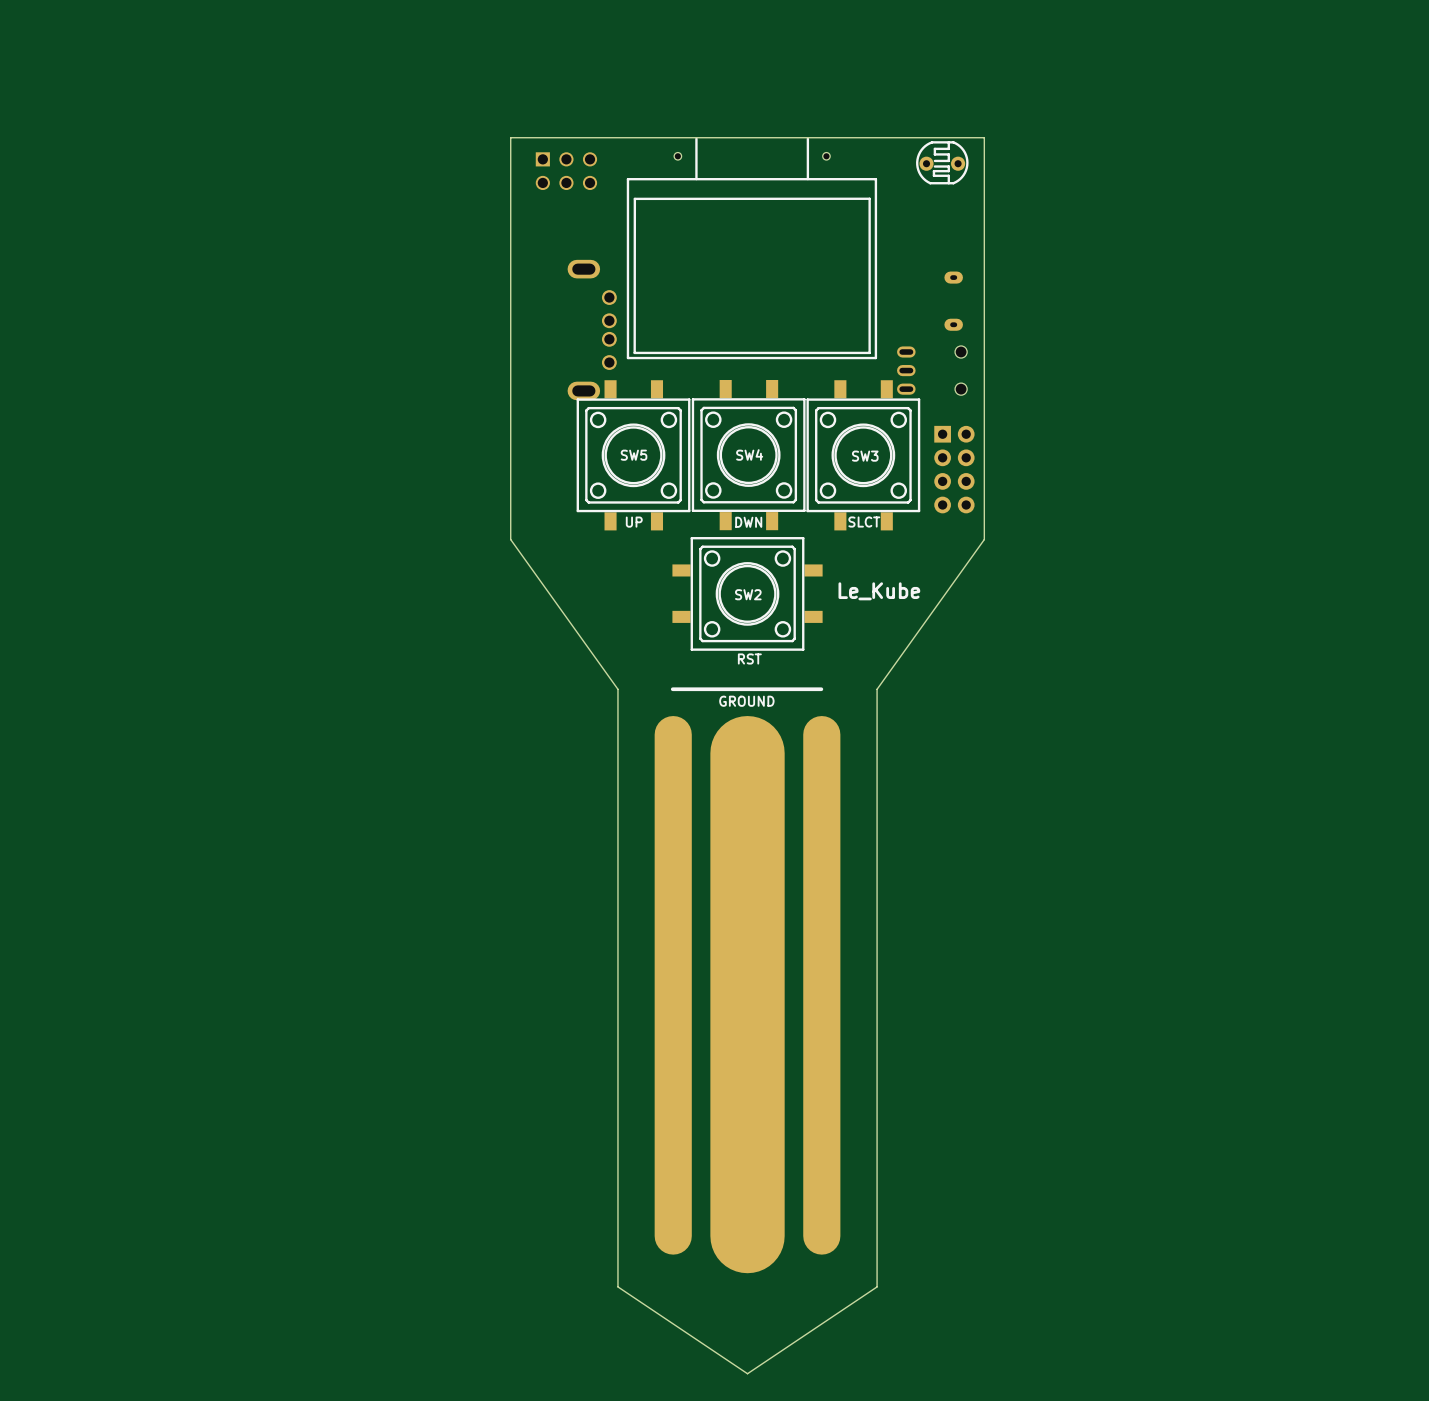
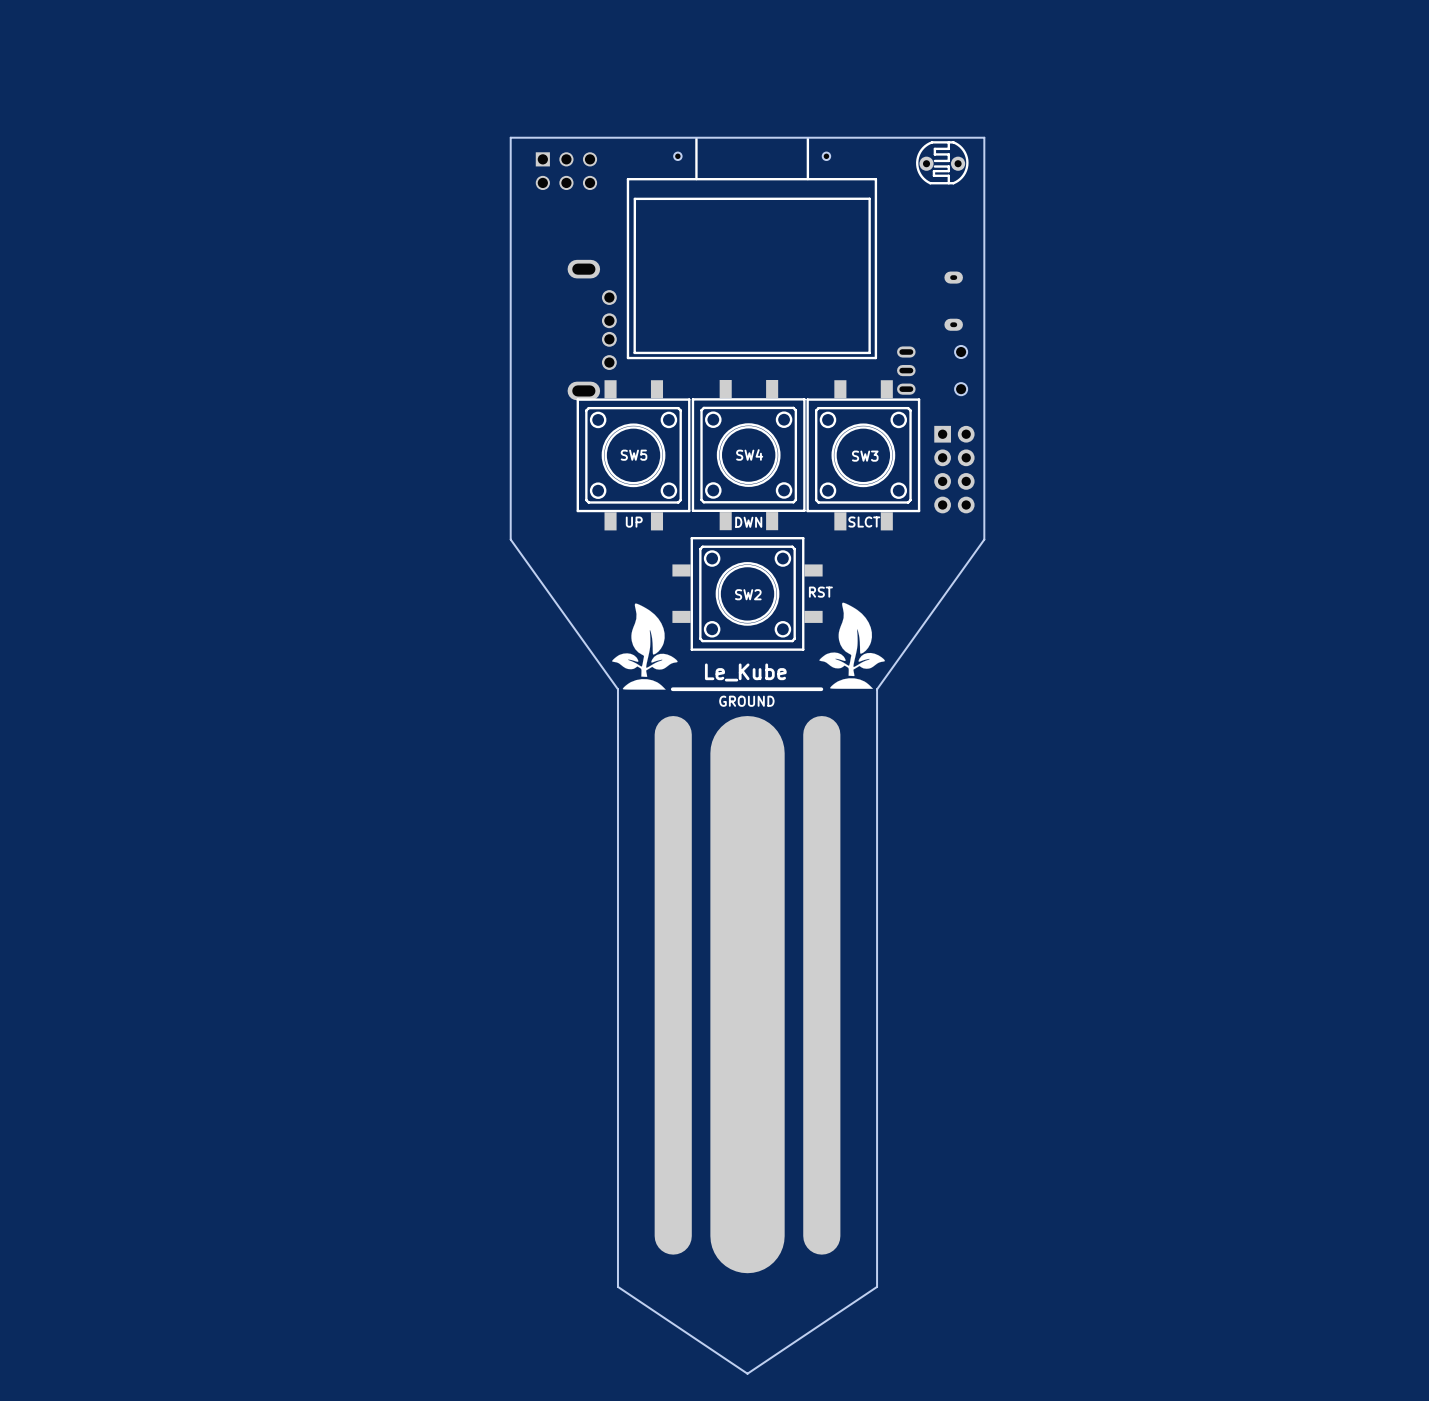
text position: Le_Kube (879, 591) -> Le_Kube (745, 672)
drawing: none -> [819, 602, 885, 689]
drawing: none -> [612, 603, 678, 690]
text position: RST (749, 658) -> RST (820, 592)

